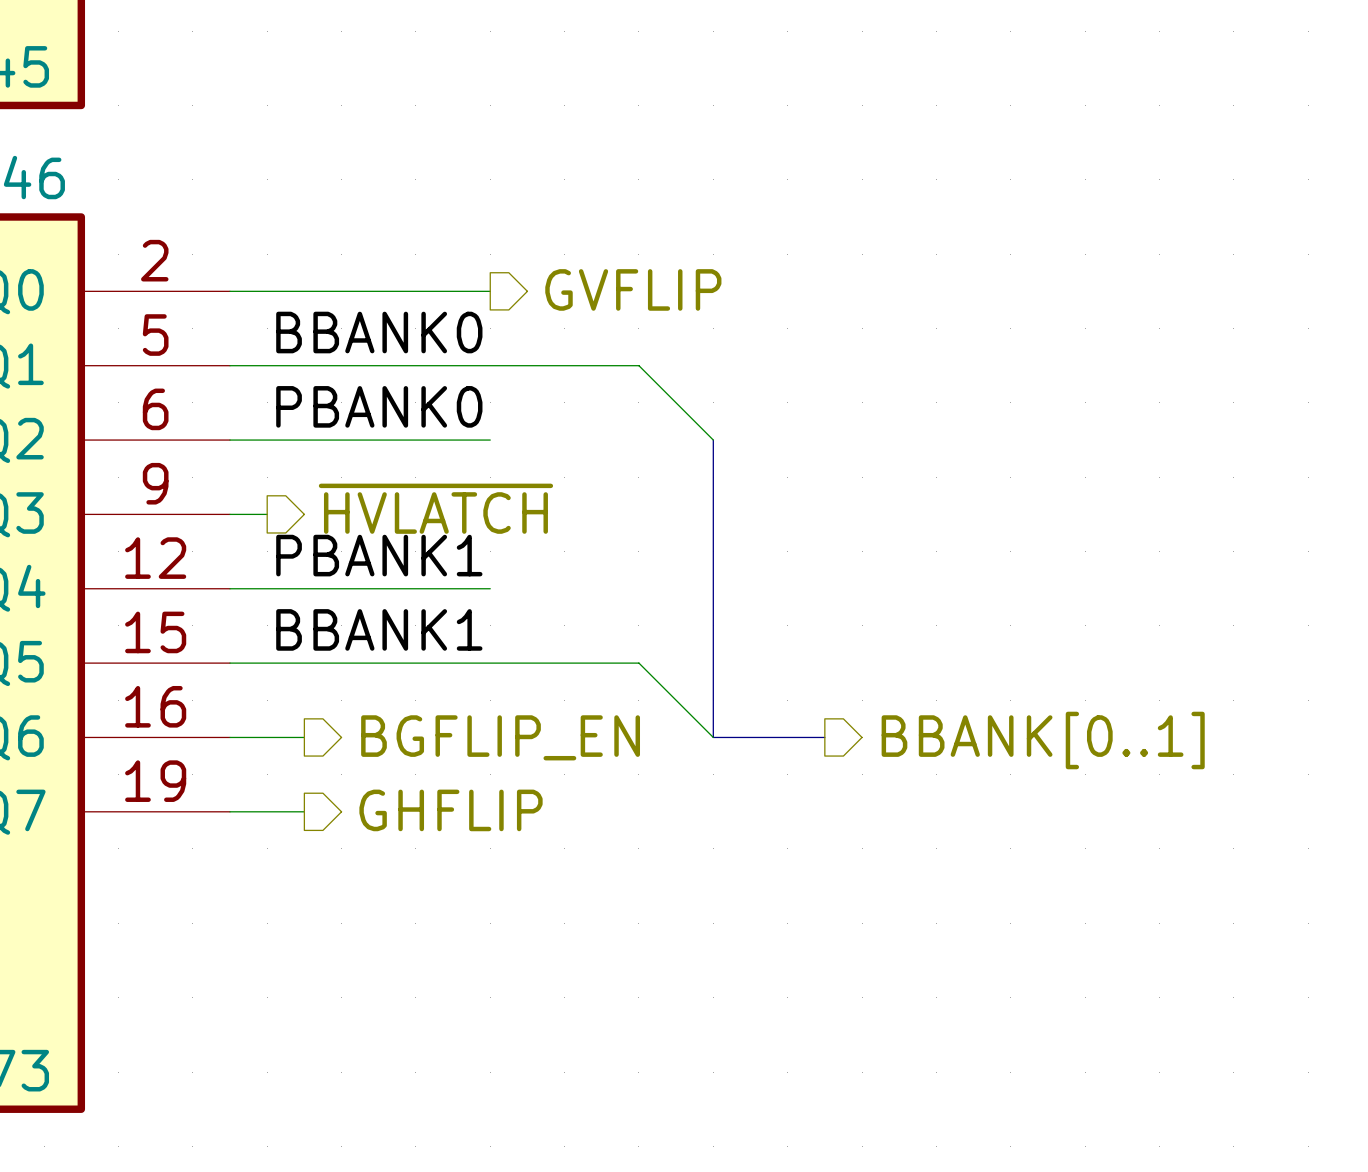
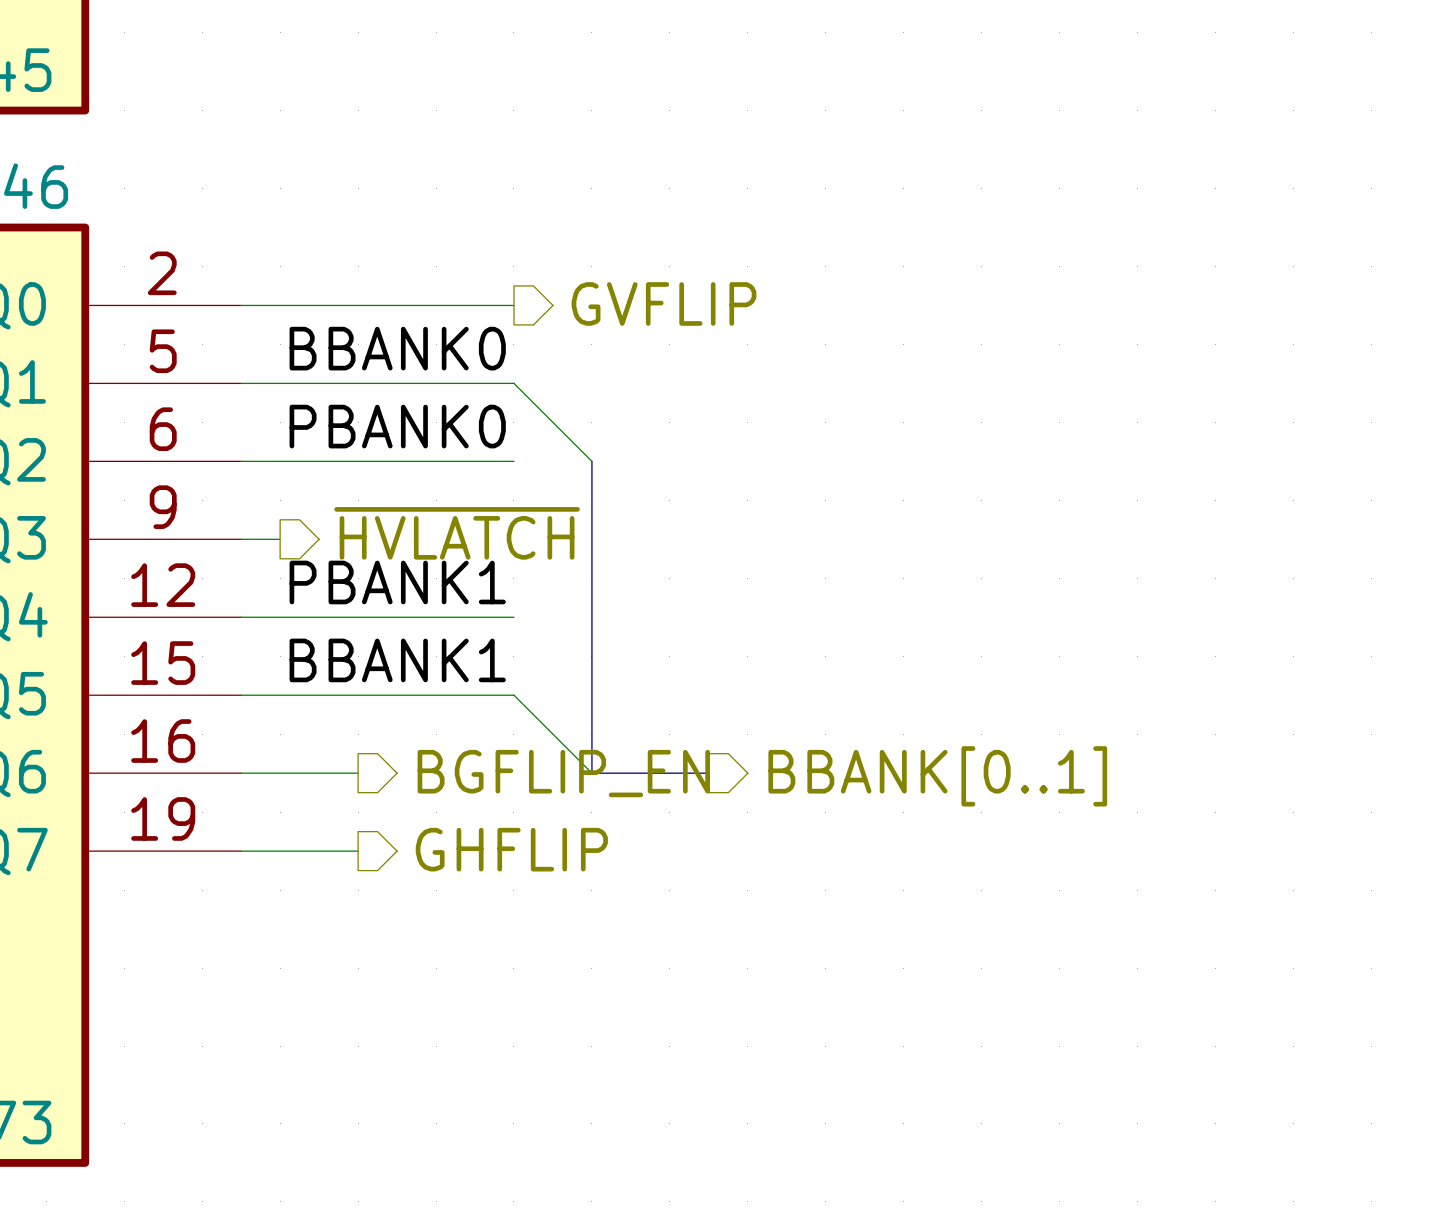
wire: (490, 365) (638, 365) (713, 440) -> (513, 383) (591, 461)
bus: (713, 440) (713, 737) (824, 737) -> (591, 461) (591, 773) (708, 773)
wire: (490, 663) (638, 663) (713, 737) -> (513, 695) (591, 773)
wire: none -> (319, 773) (358, 773)
hierarchical label position: BGFLIP_EN (500, 737) -> BGFLIP_EN (563, 773)
hierarchical label position: BBANK[0..1] (1043, 740) -> BBANK[0..1] (937, 776)
hierarchical label position: GHFLIP (451, 810) -> GHFLIP (511, 849)
wire: none -> (319, 851) (358, 851)

